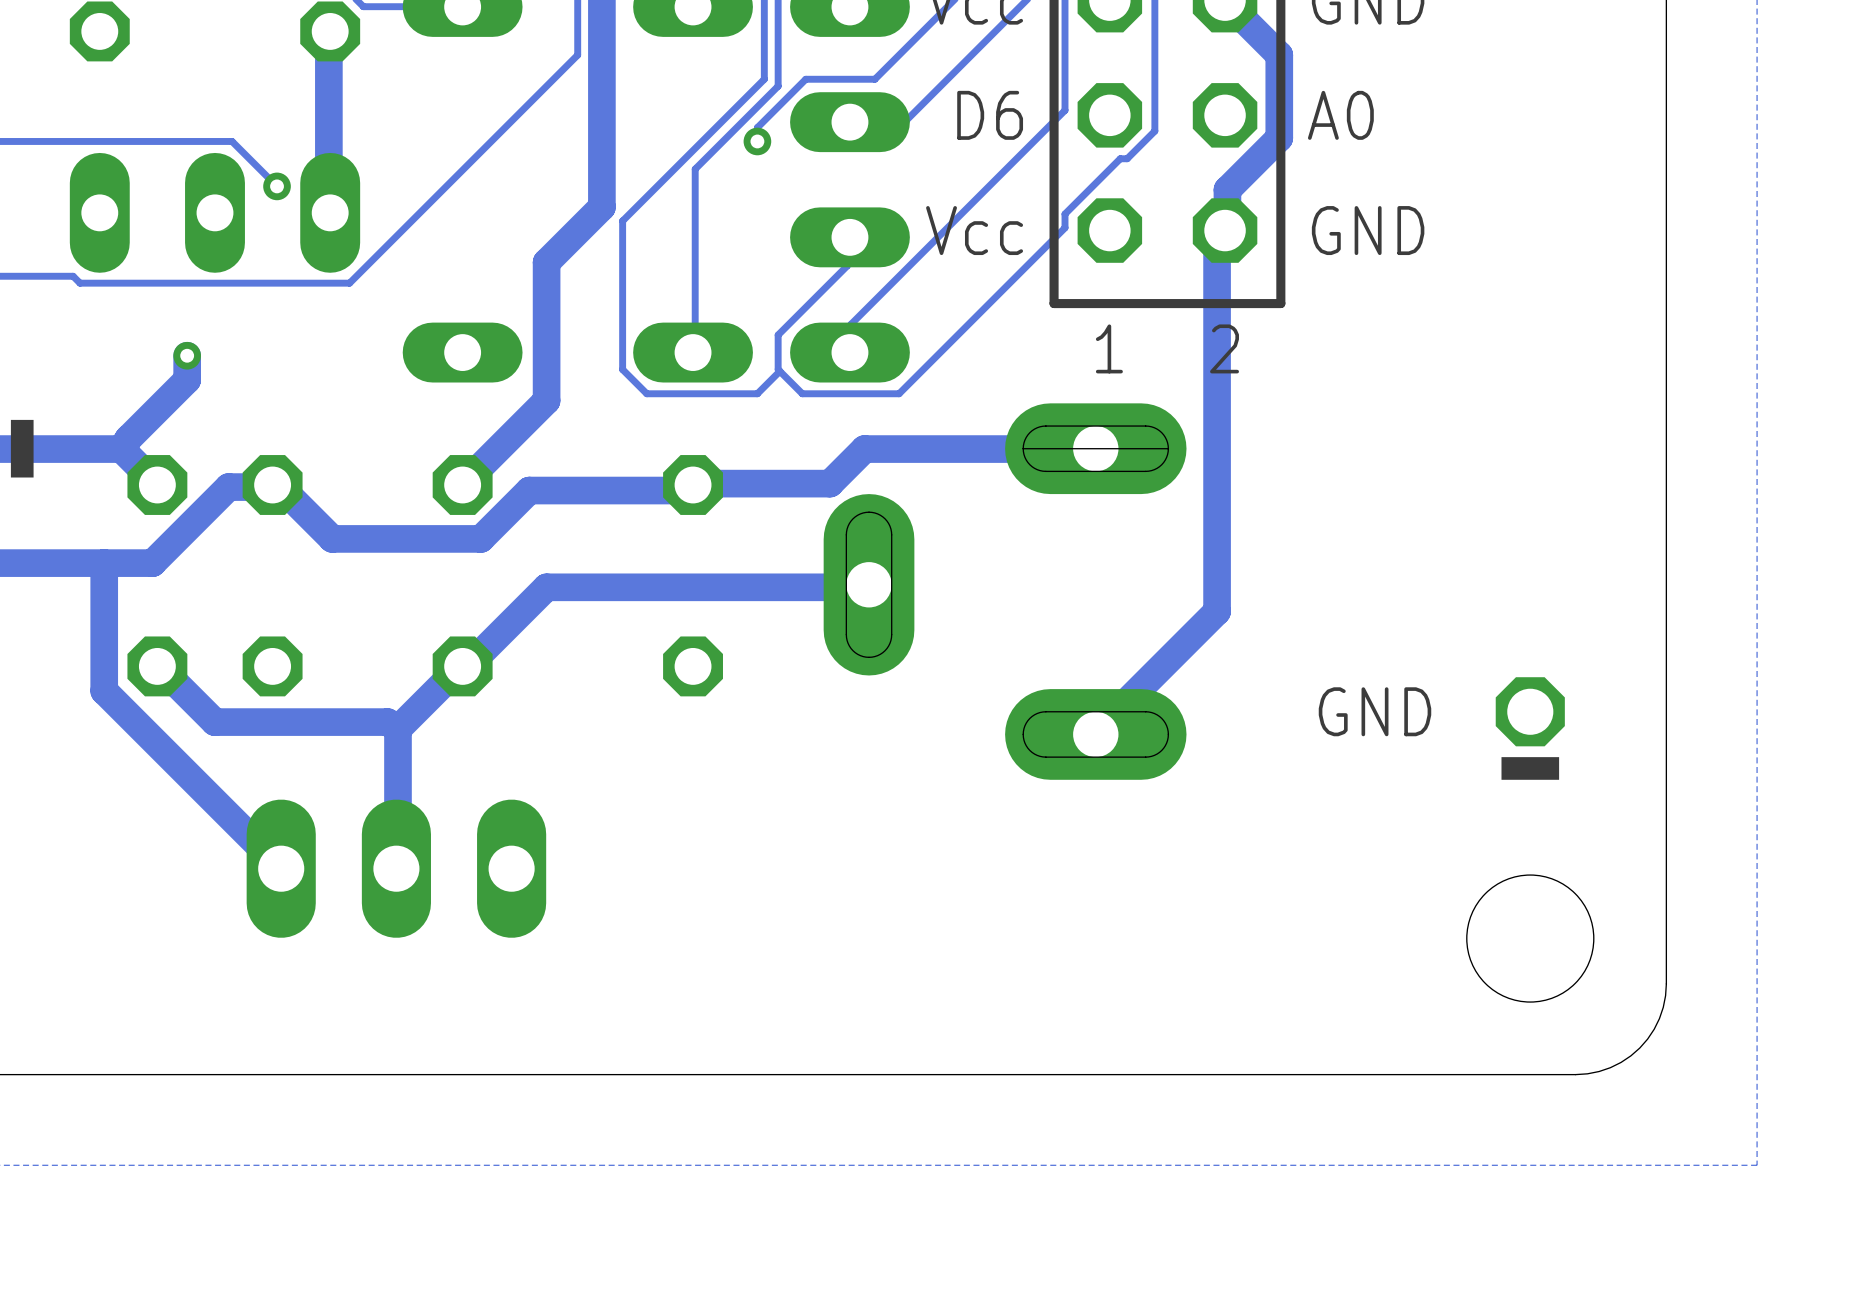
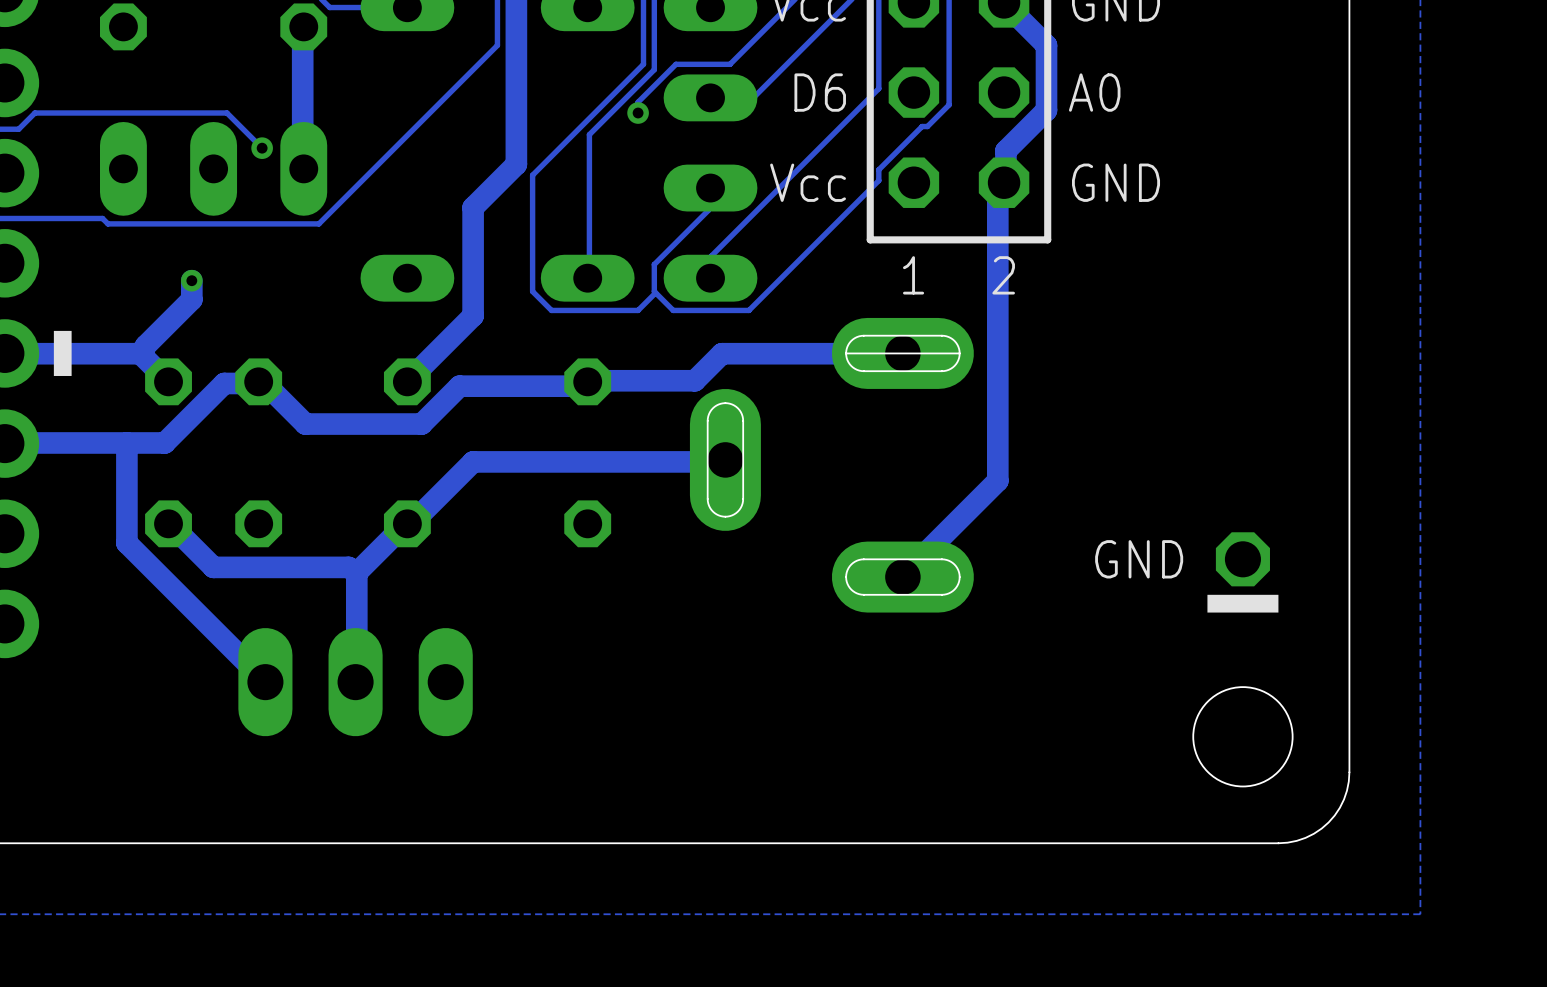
text position: GND (1374, 711) -> GND (1139, 559)
drawing shape: [1501, 757, 1560, 780] -> [1207, 594, 1279, 613]

